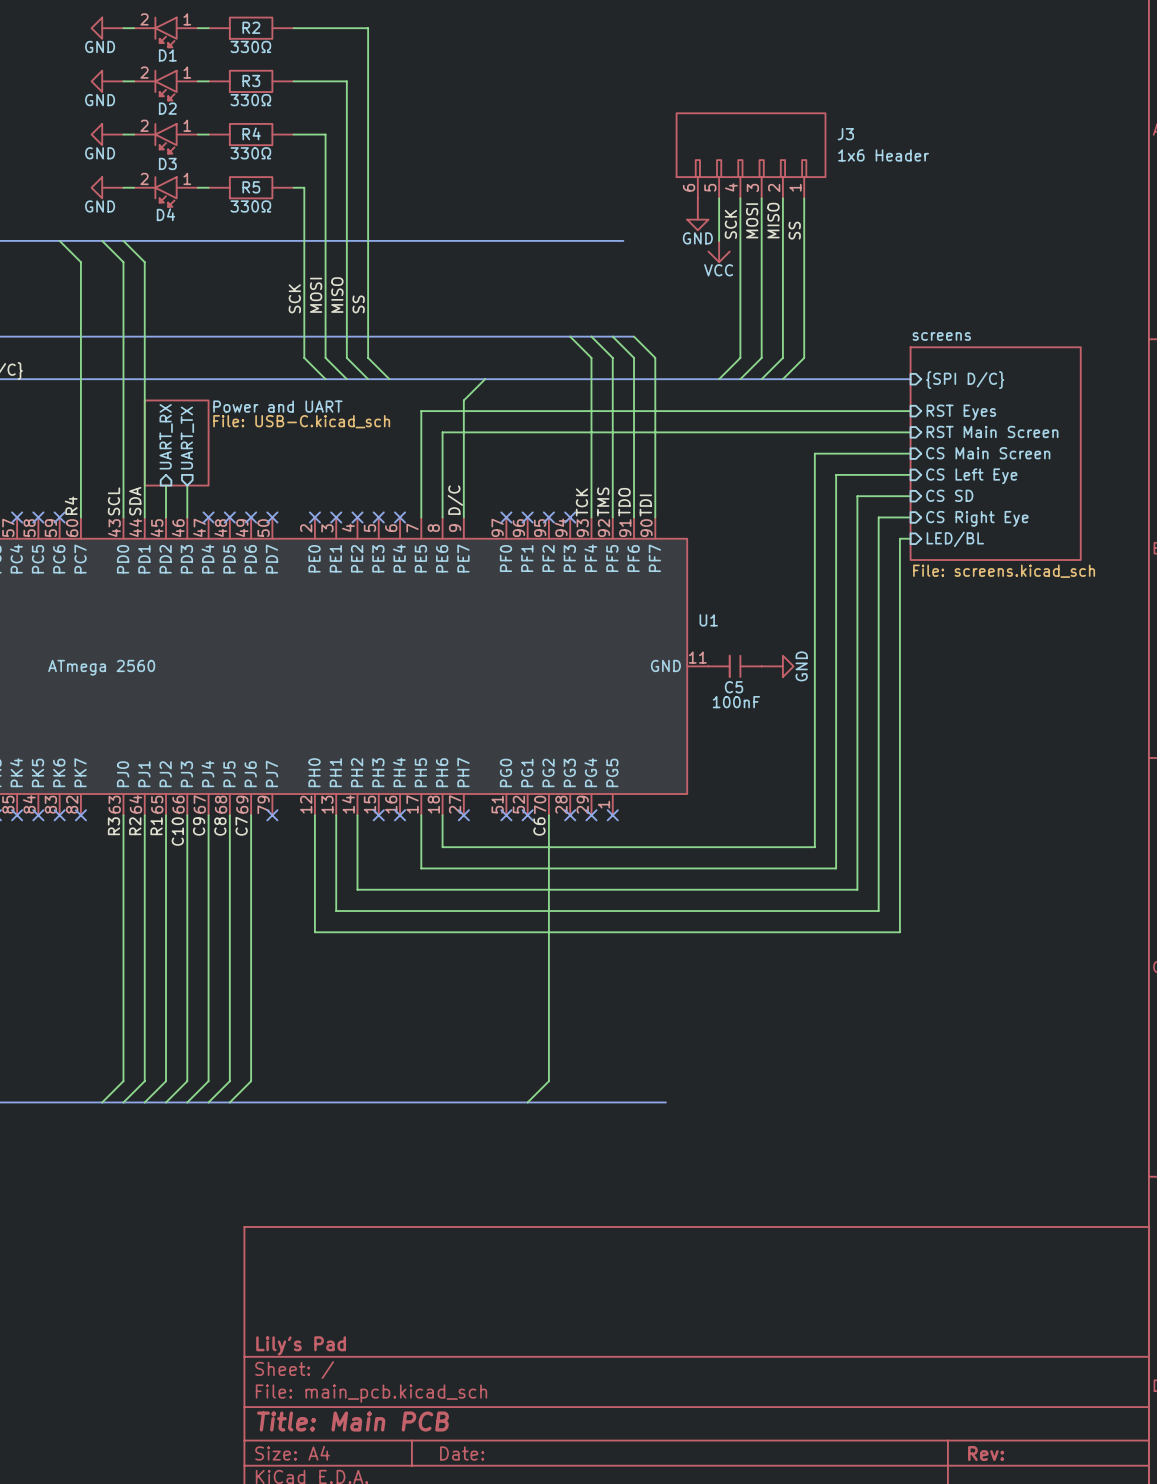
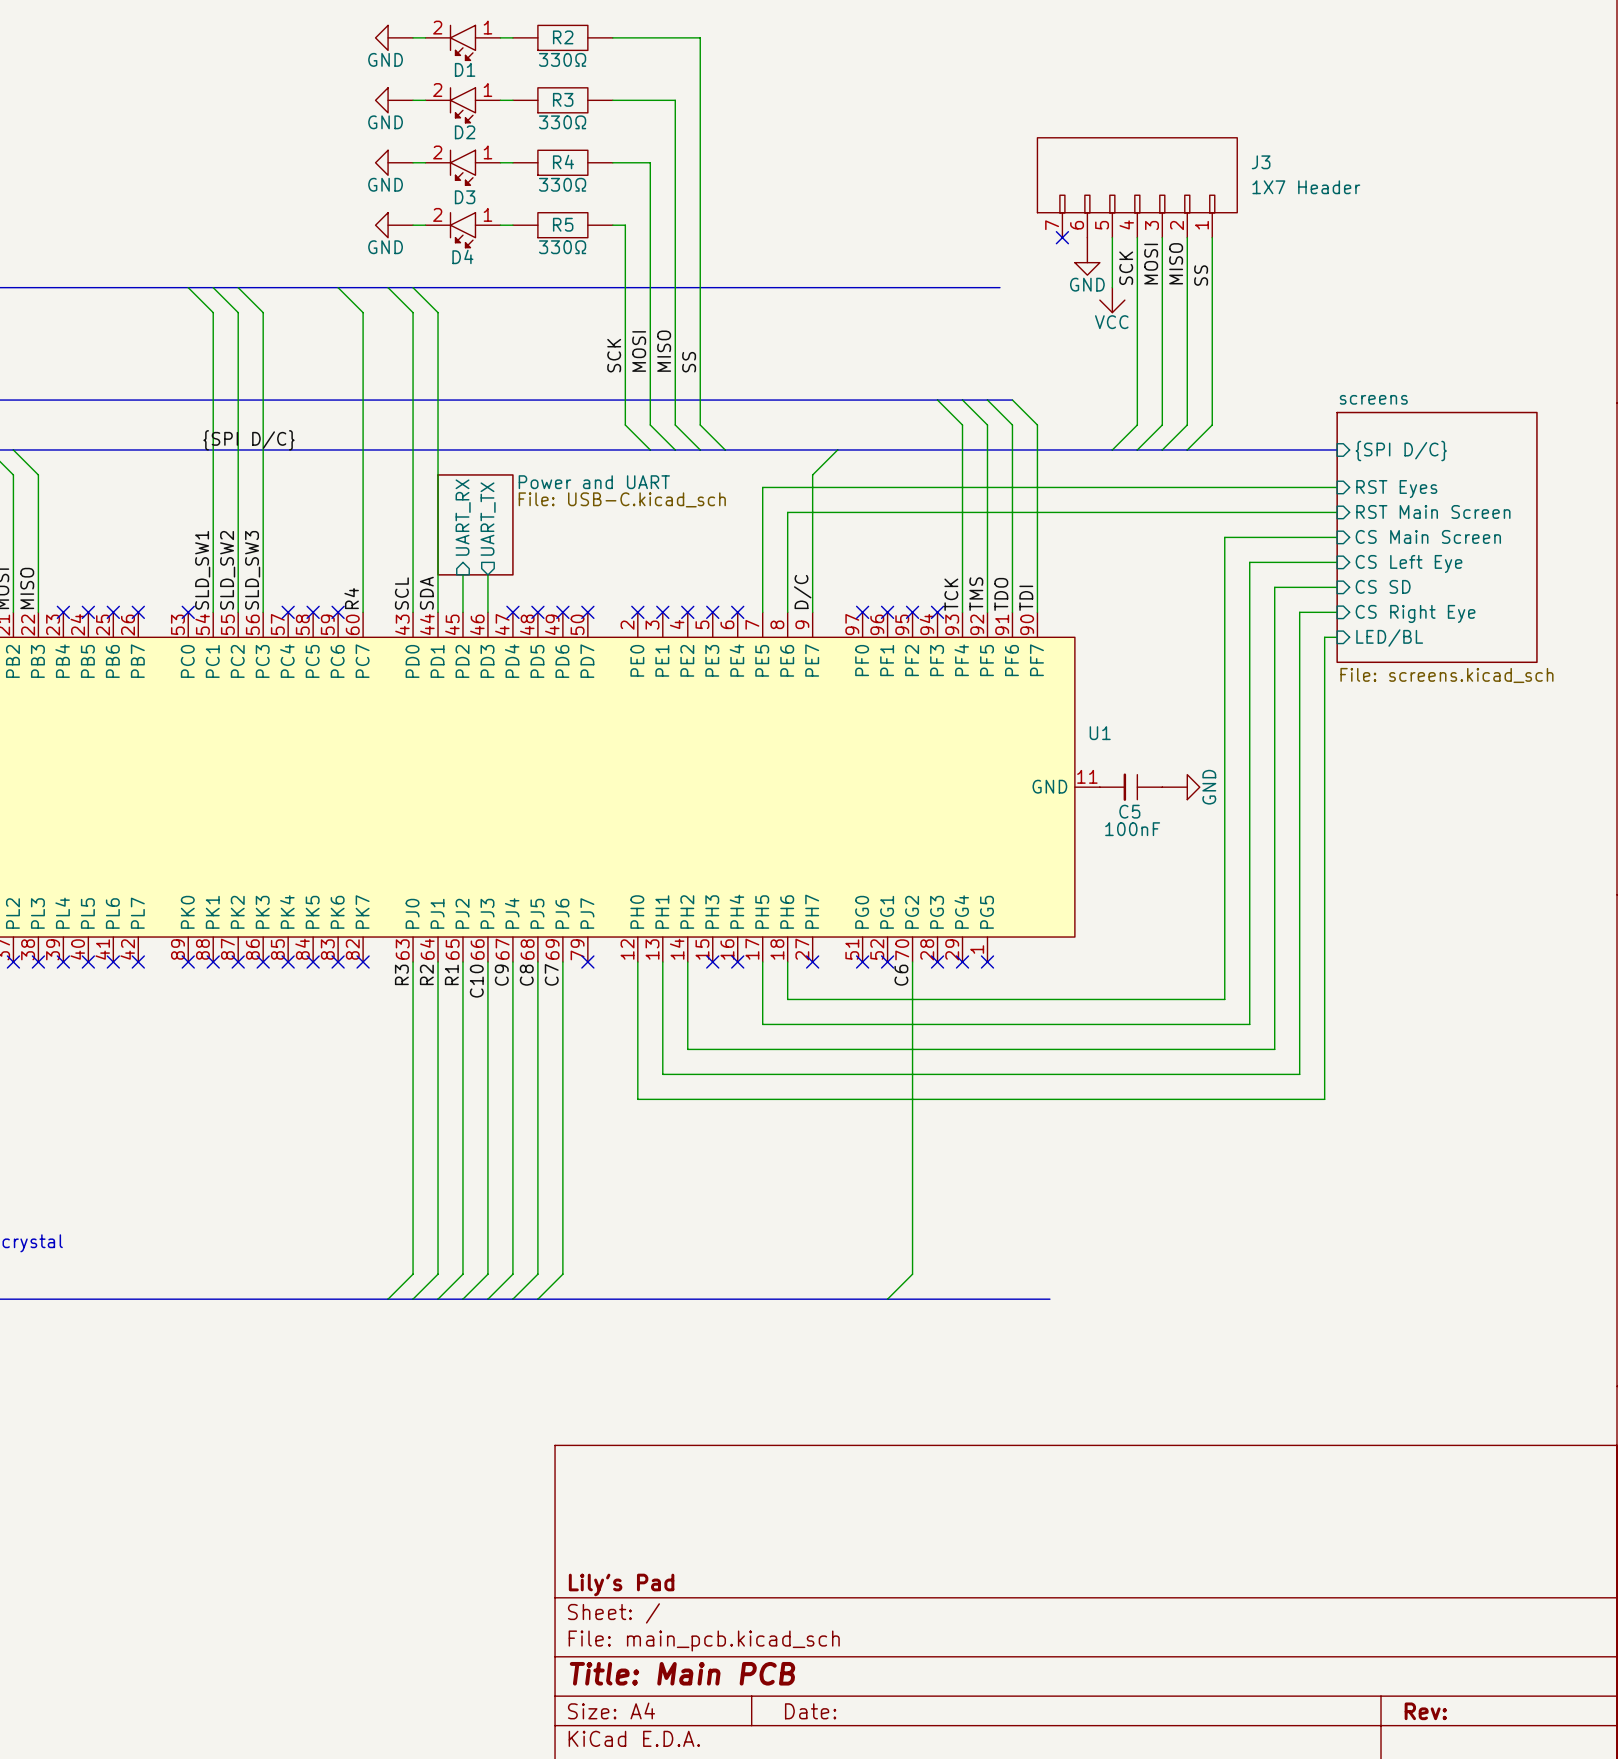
J3 symbol: [676, 113, 826, 199] -> [1037, 137, 1238, 238]
J3 value: 1x6 Header (883, 155) -> 1X7 Header (1306, 187)
no-connect mark: none -> (1062, 237)
U1 value: ATmega 2560 (101, 667) -> none

